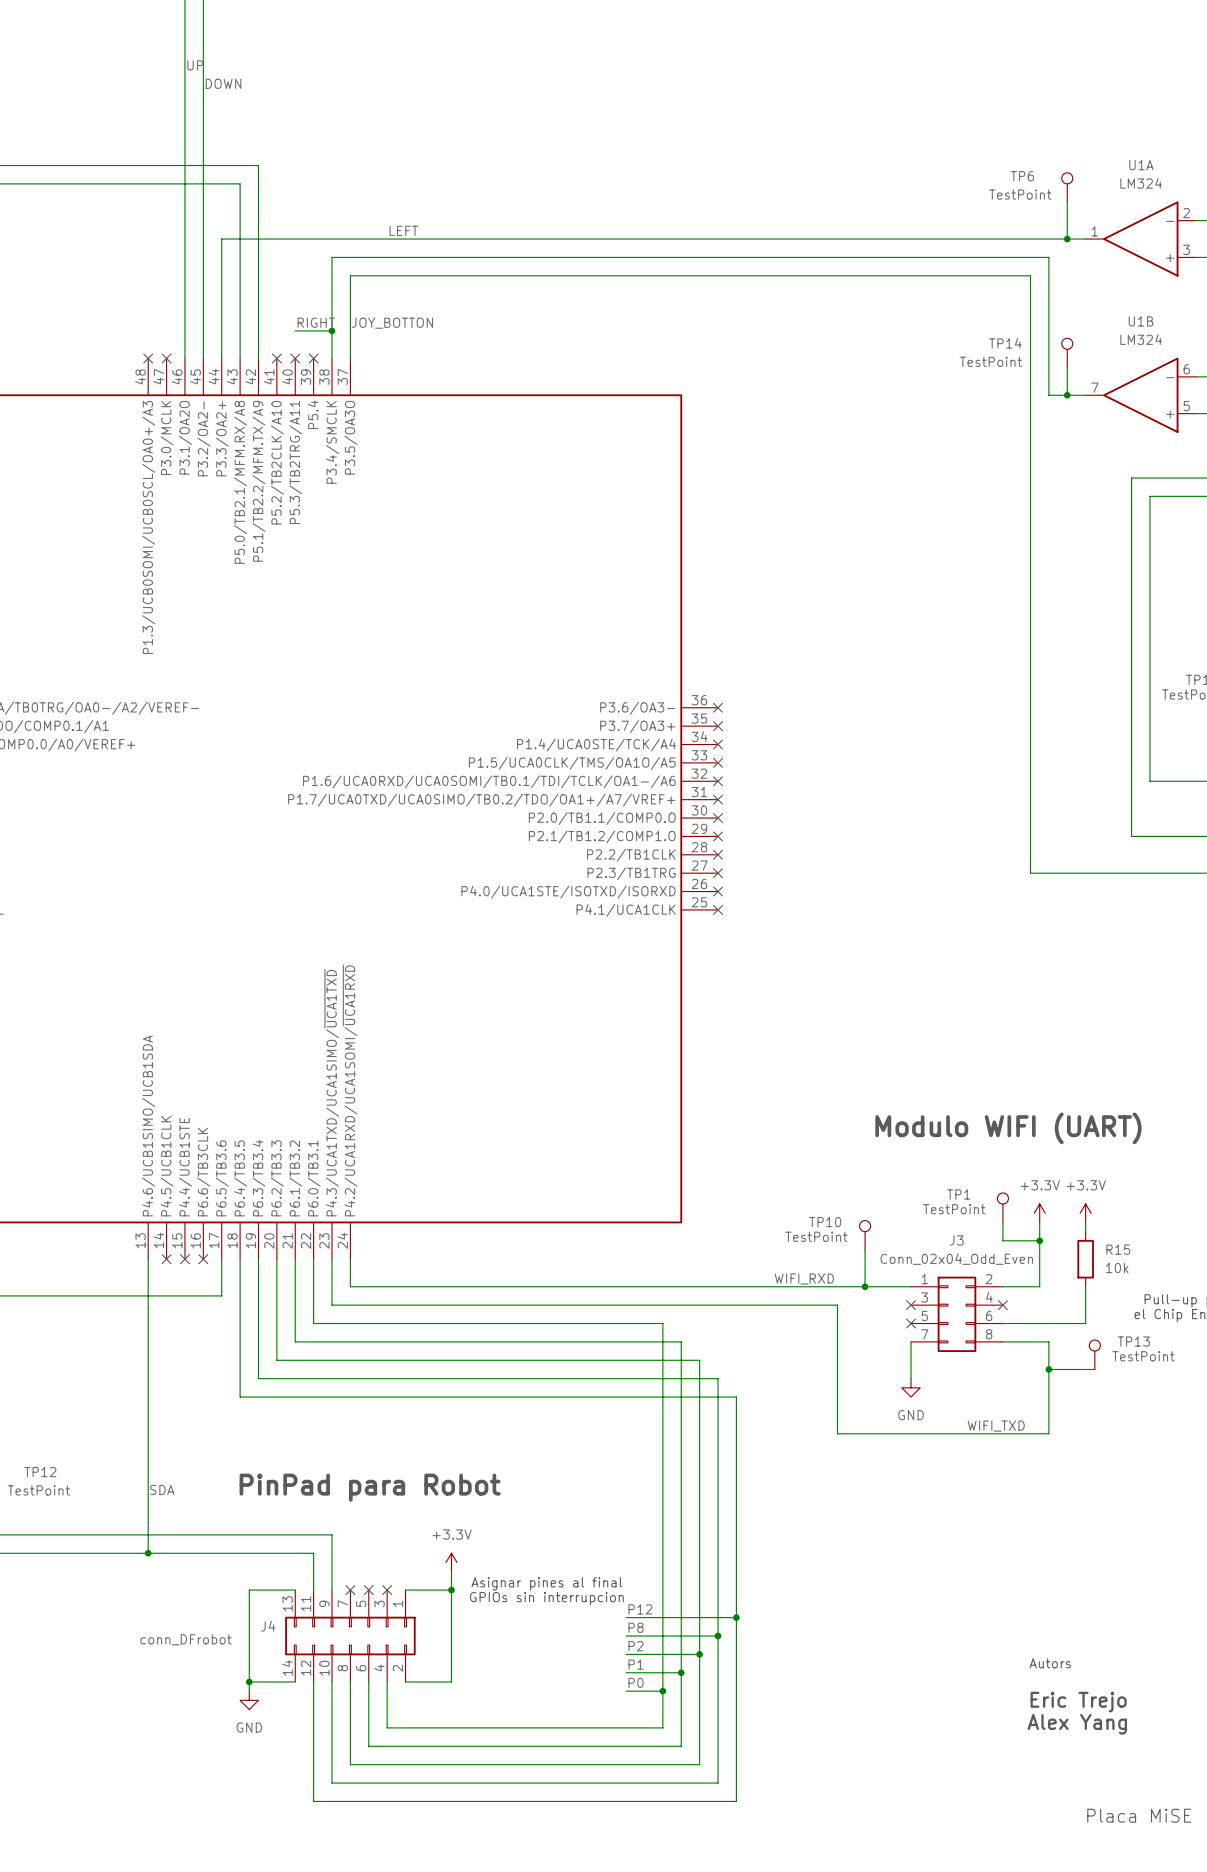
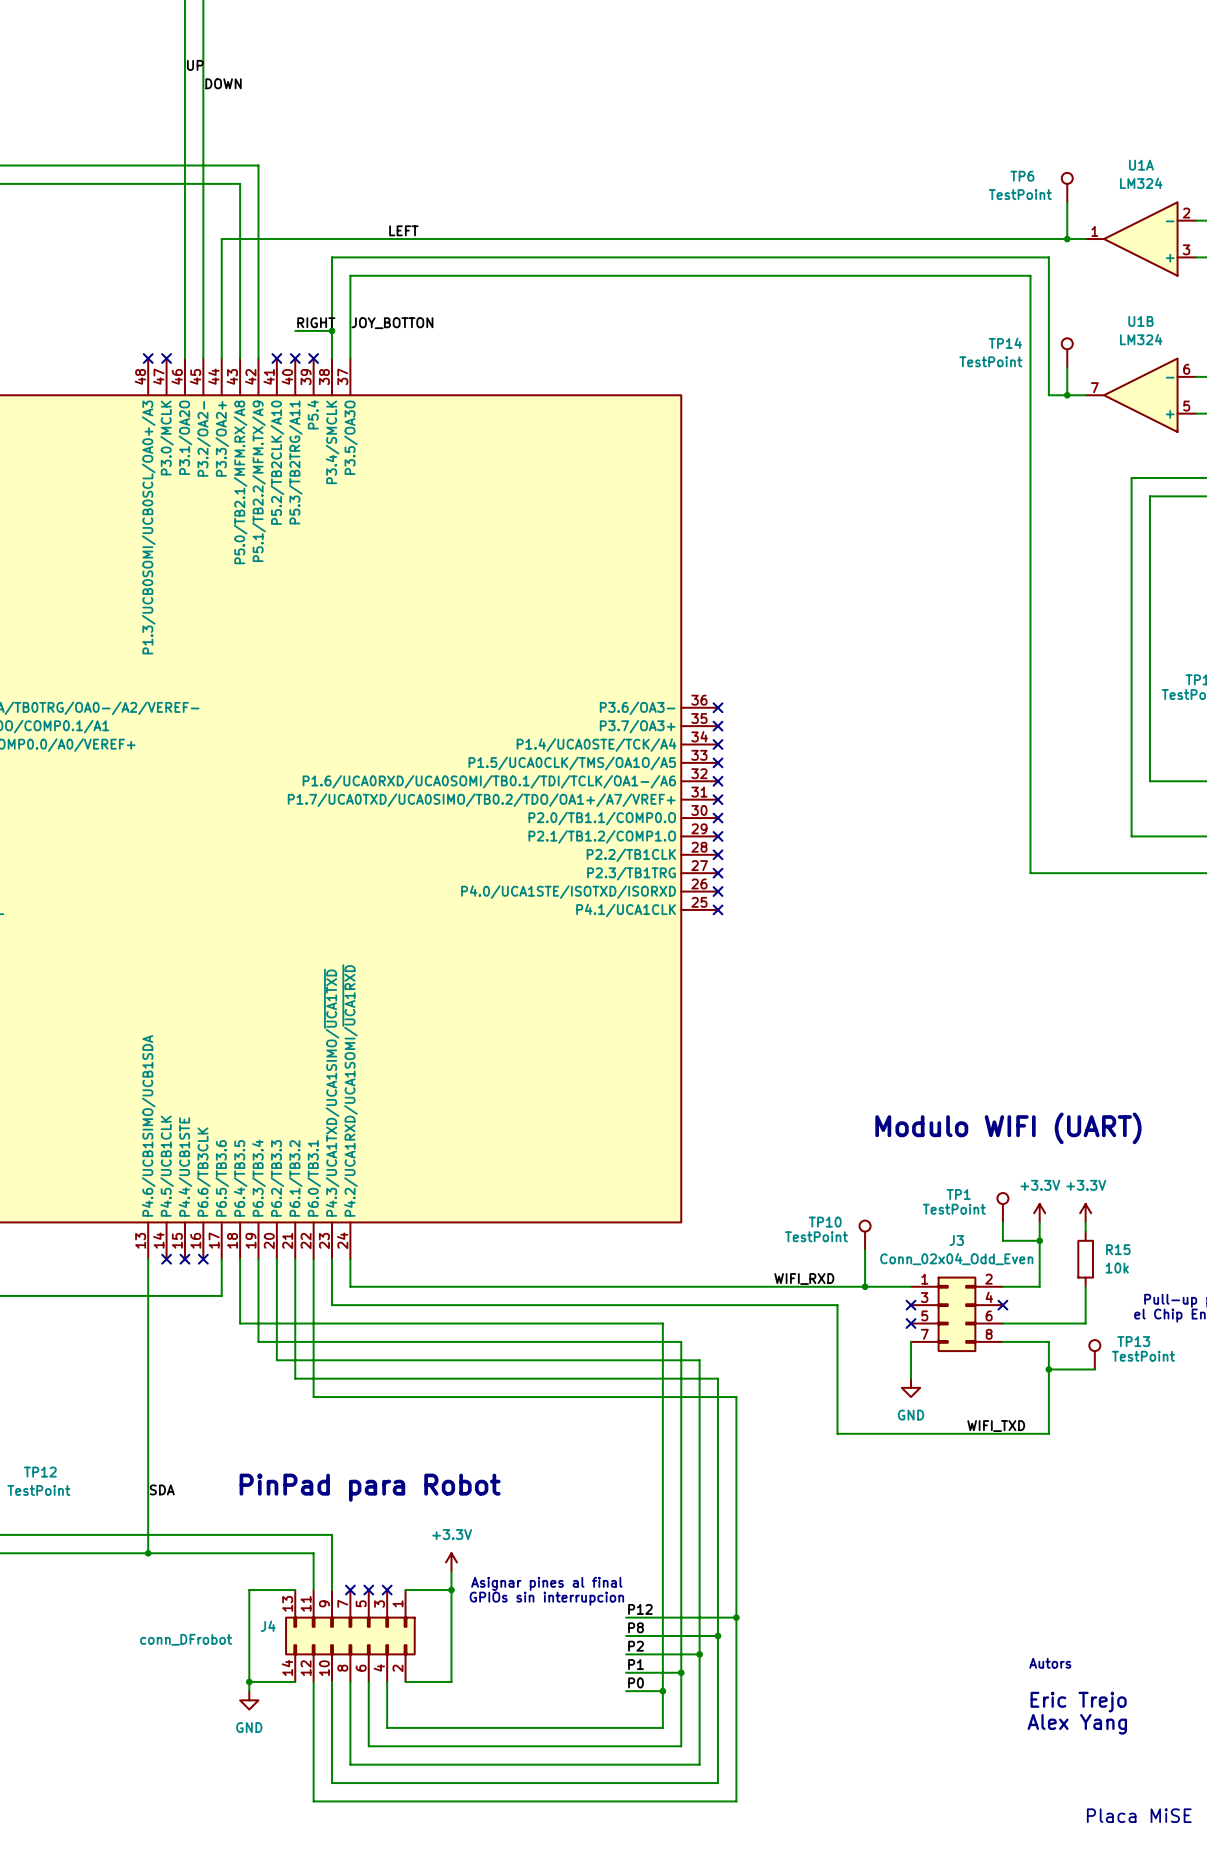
wire: (240, 1323) (240, 1397) (313, 1397) -> (240, 1323) (313, 1323) (313, 1397)
wire: (258, 1341) (258, 1378) (295, 1378) -> (258, 1341) (295, 1341) (295, 1378)

